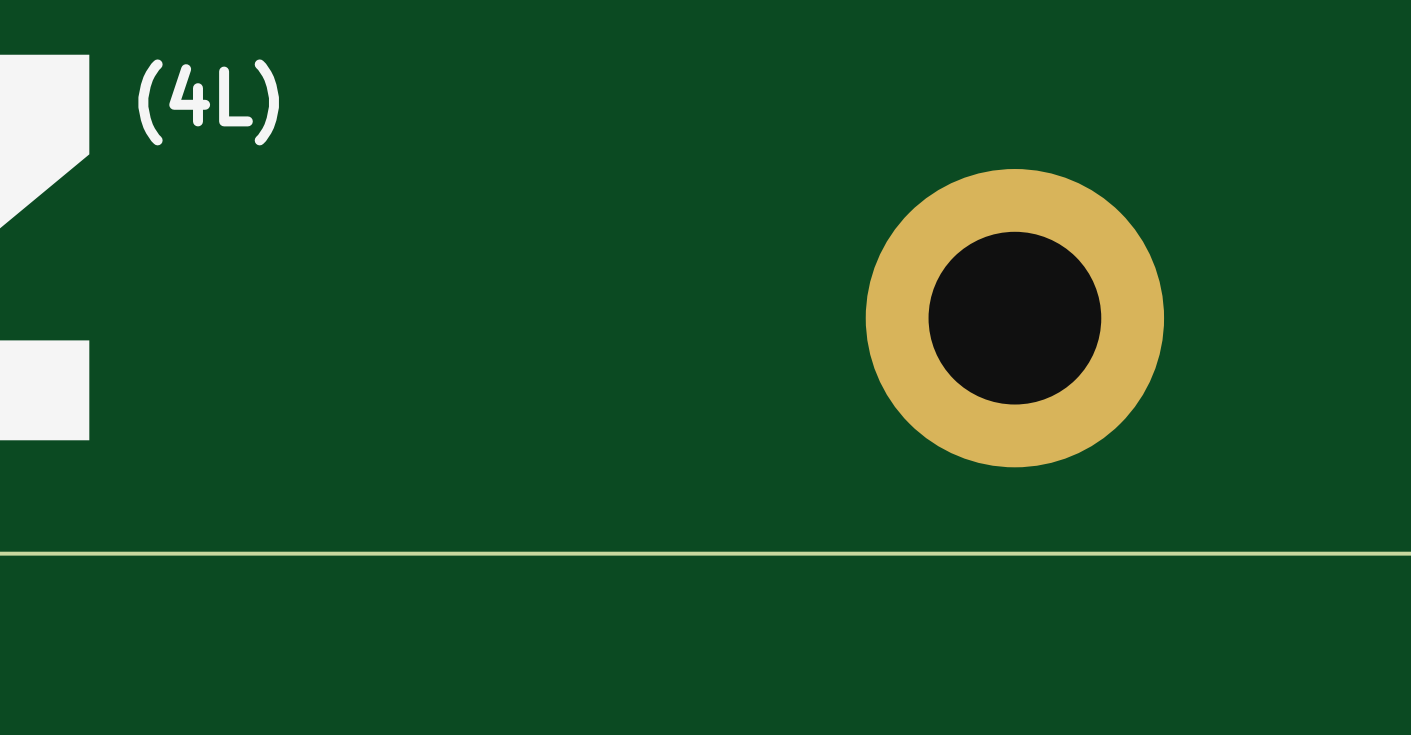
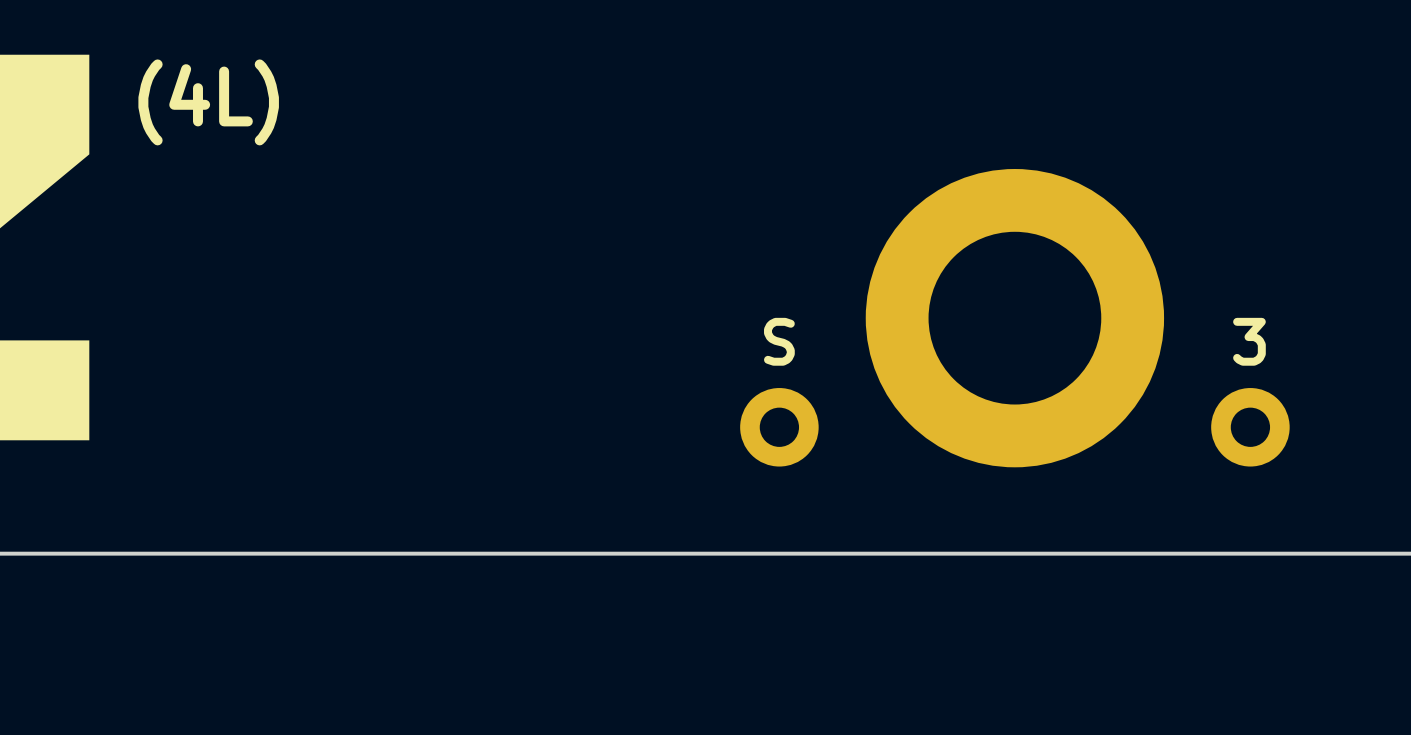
text: none -> S (779, 341)
text: none -> 3 (1249, 341)
part: none -> (779, 427)
part: none -> (1250, 427)

